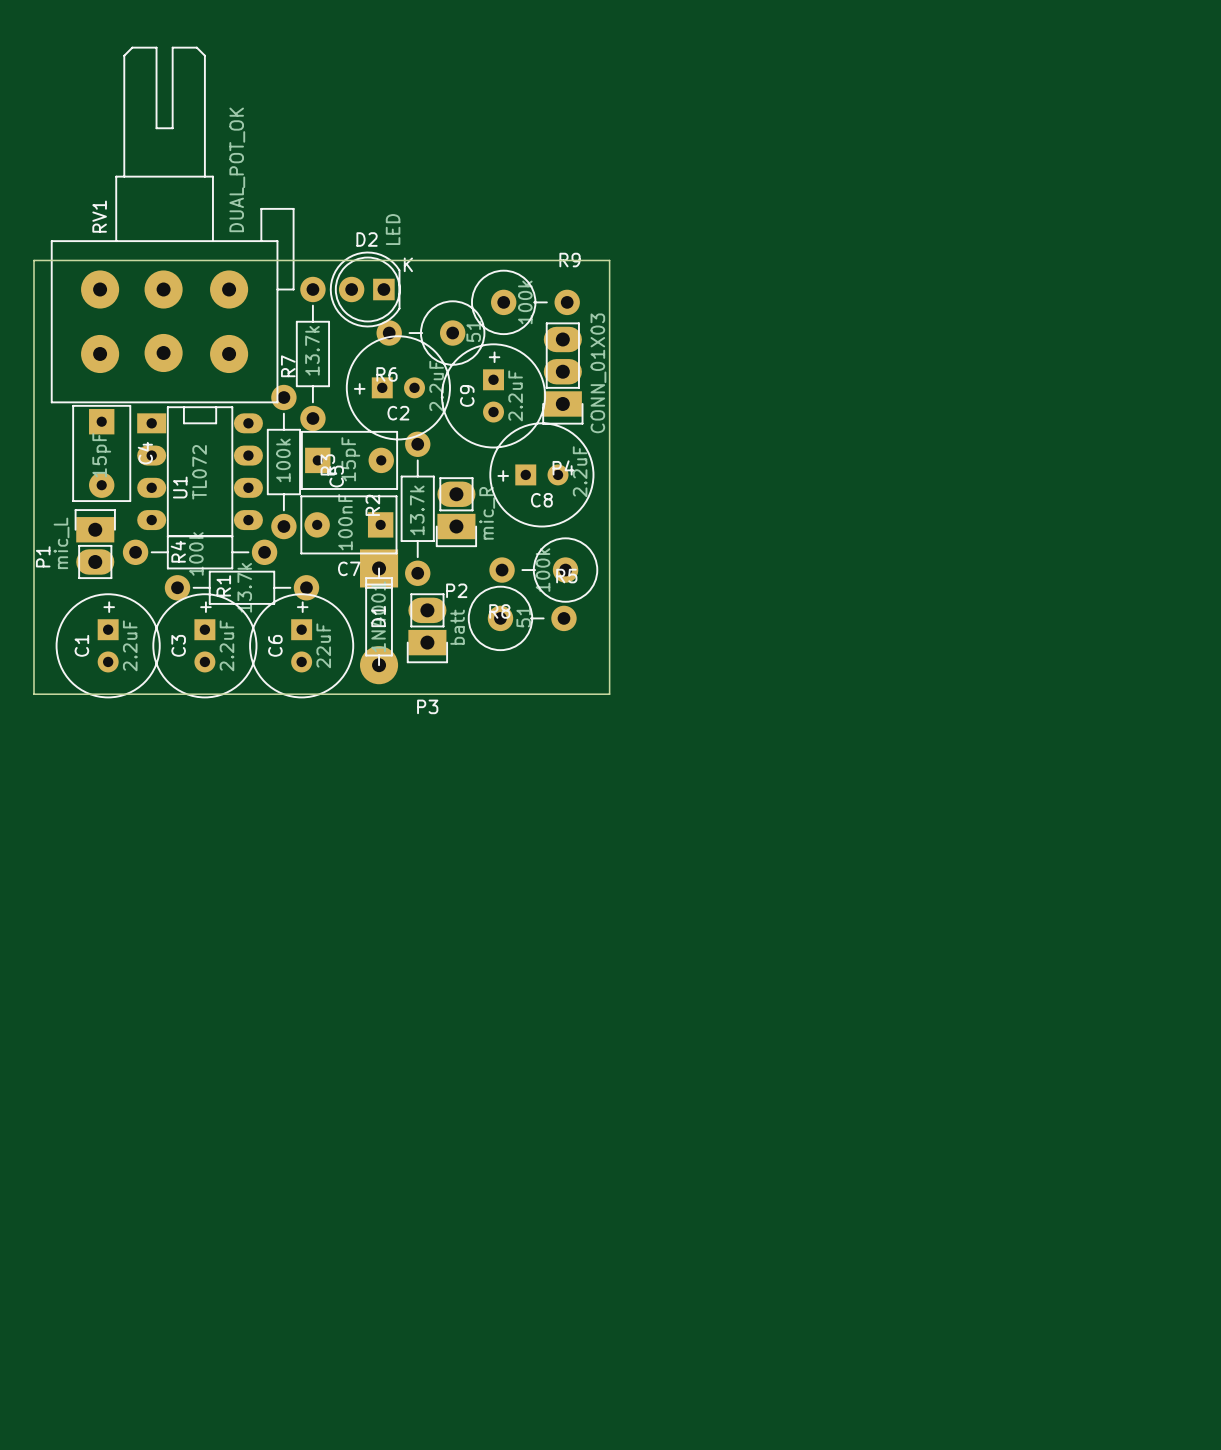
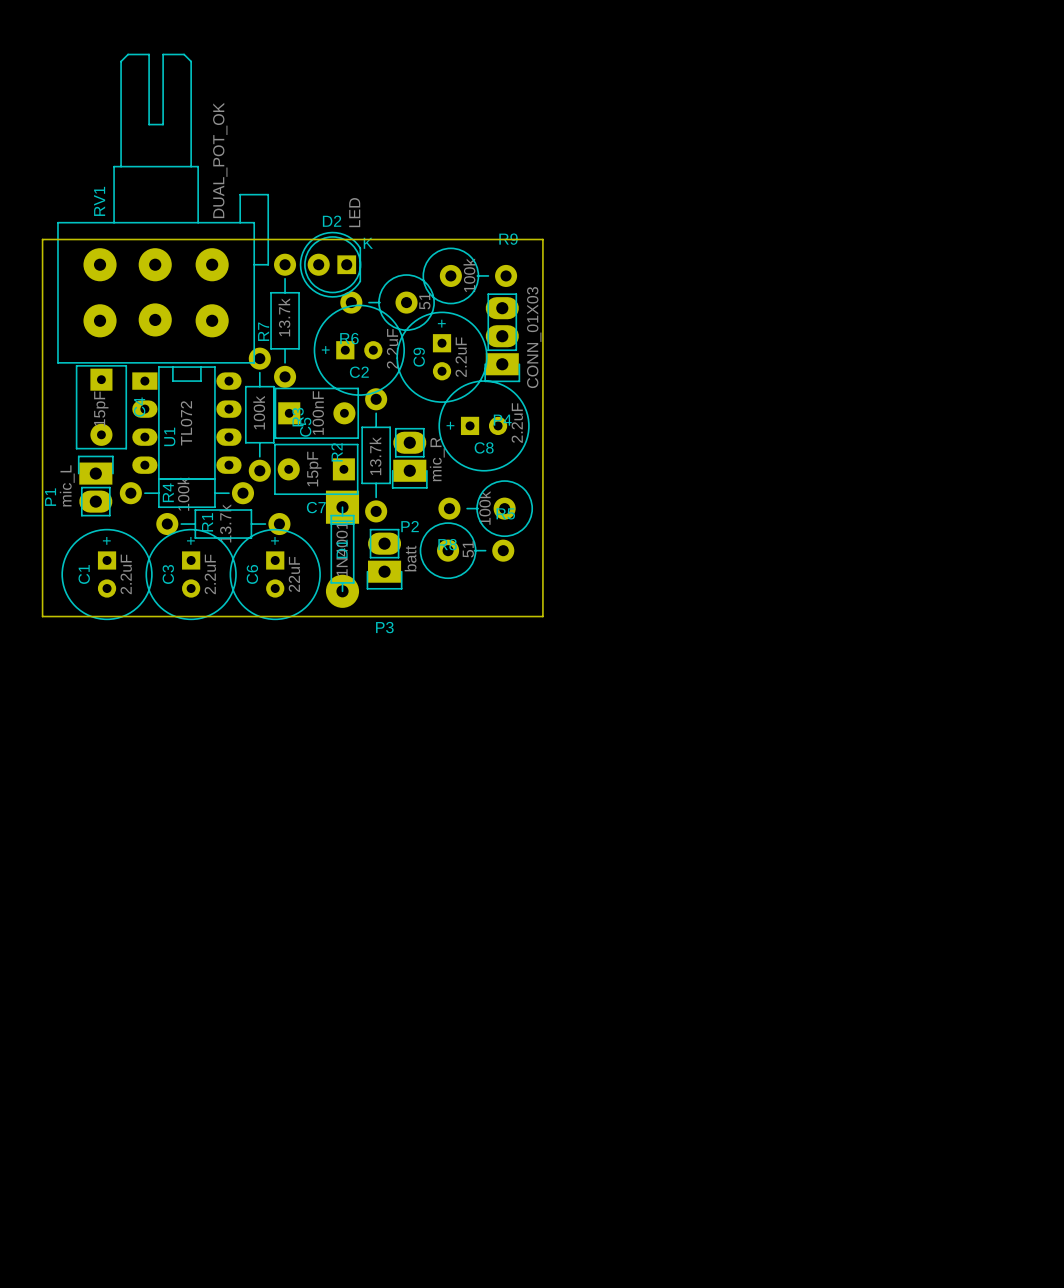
C5 value position: 15pF (350, 459) -> 15pF (314, 469)
C7 value position: 100nF (345, 522) -> 100nF (318, 413)

